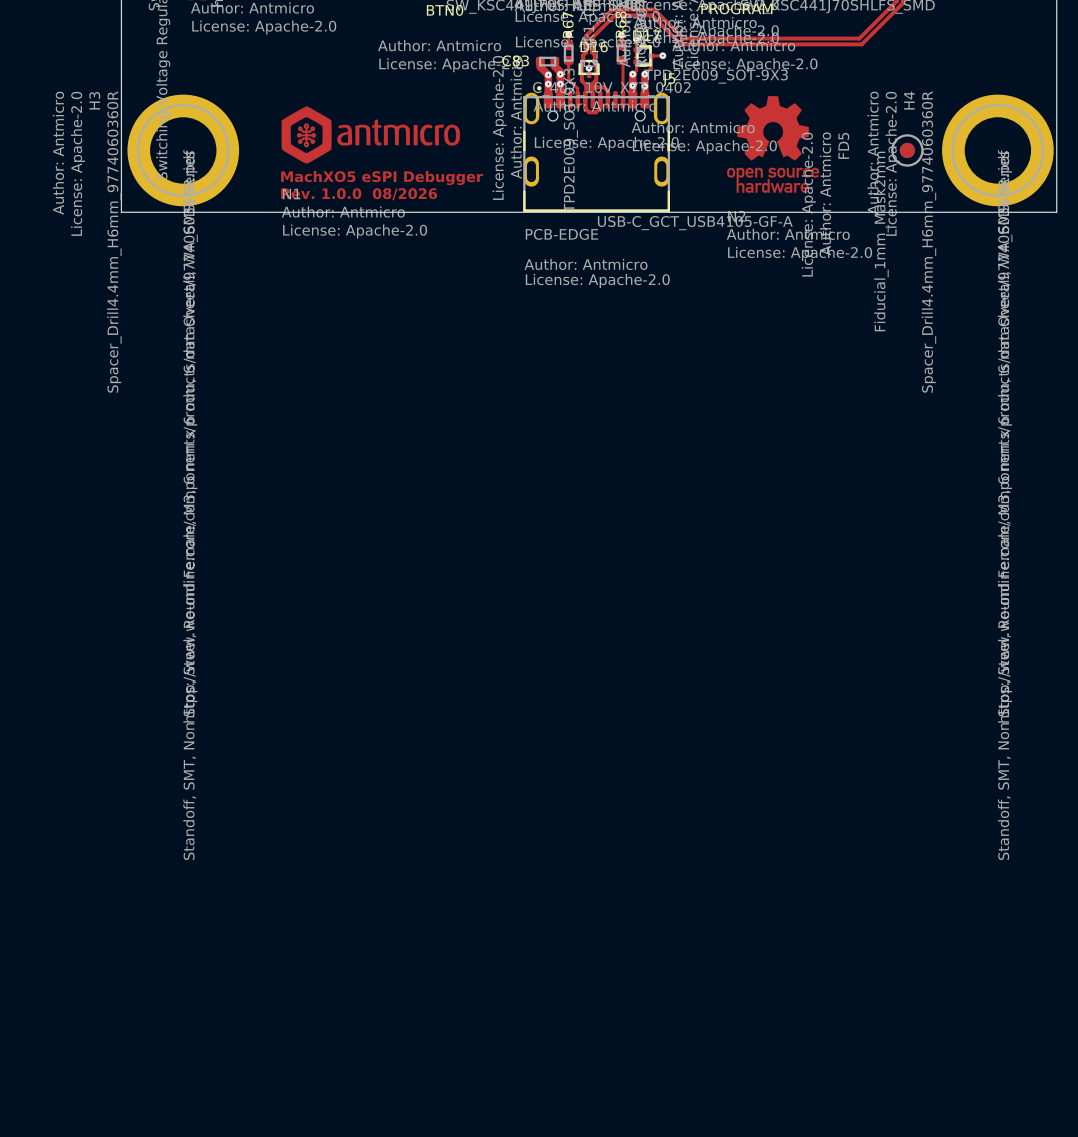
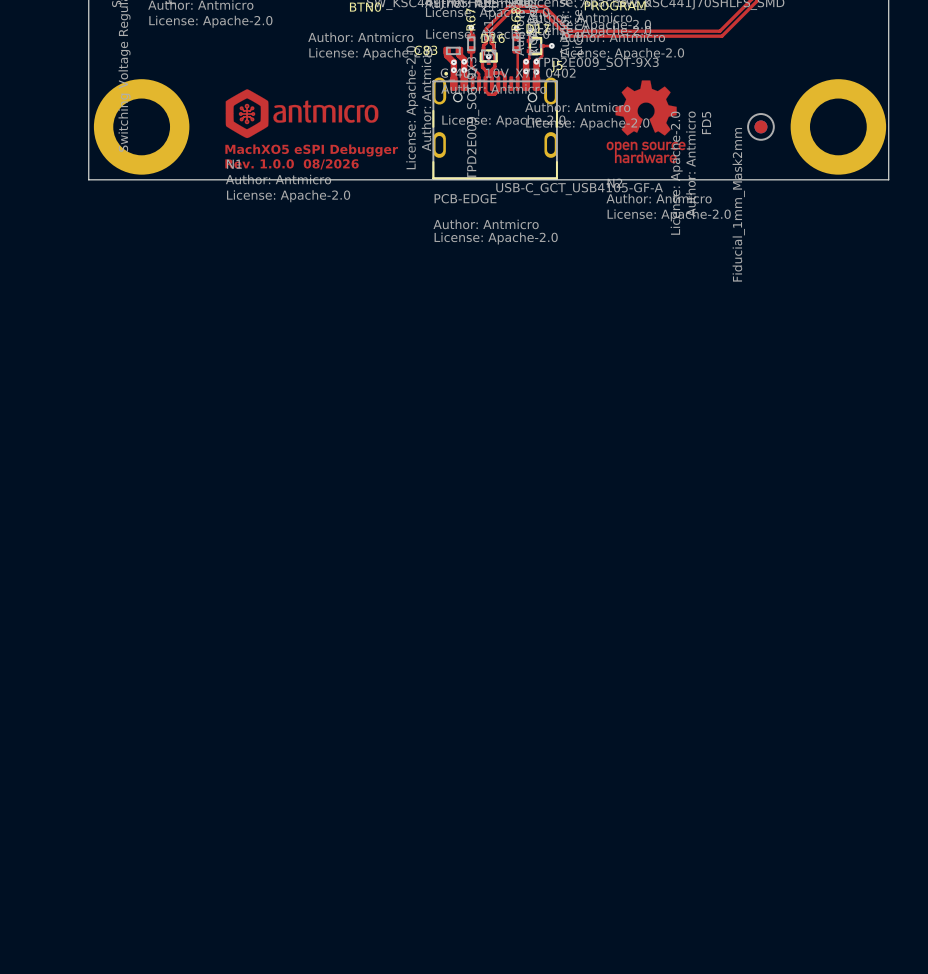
H3 side: top (183, 150) -> bottom (141, 126)
H4 side: top (997, 150) -> bottom (838, 126)

